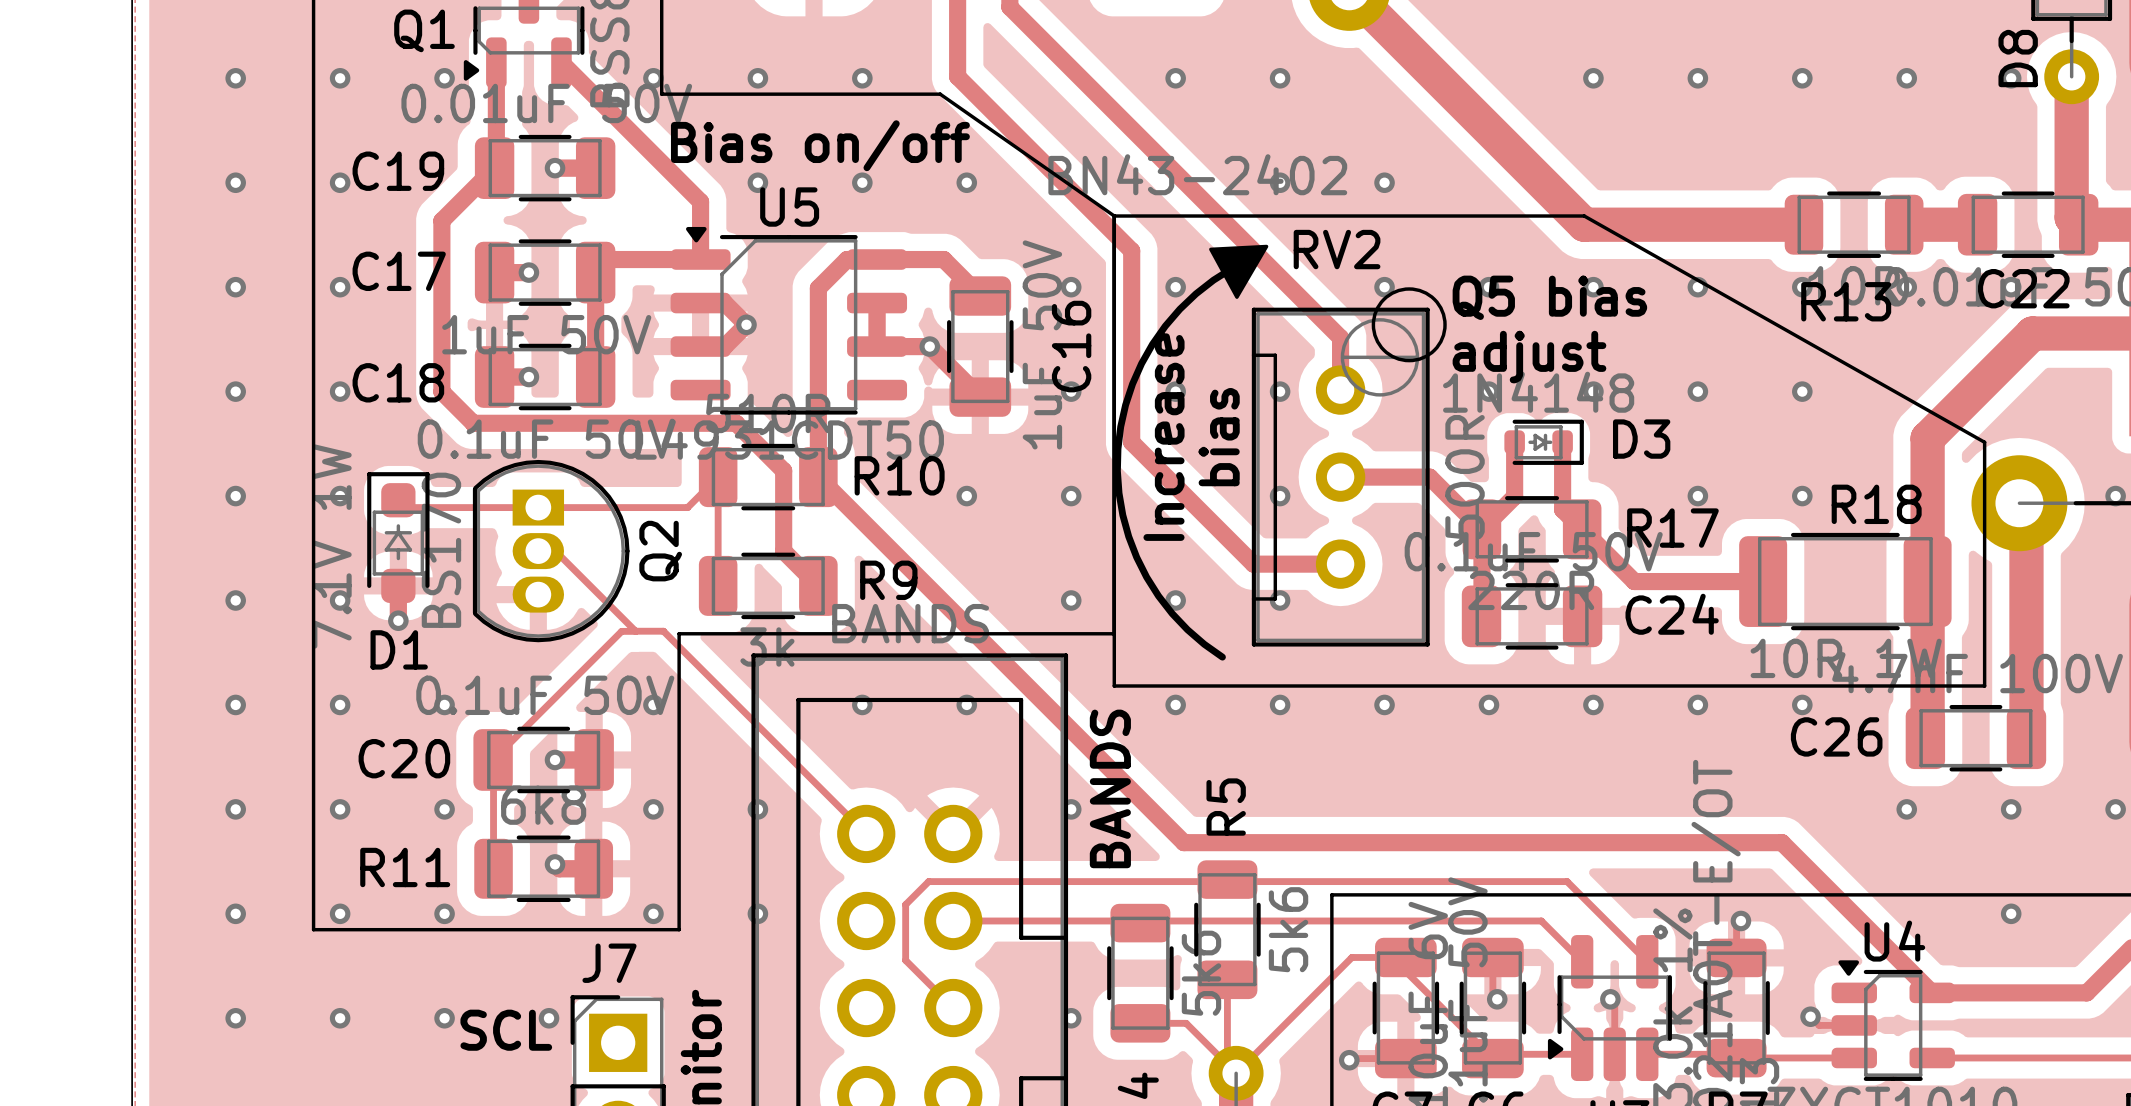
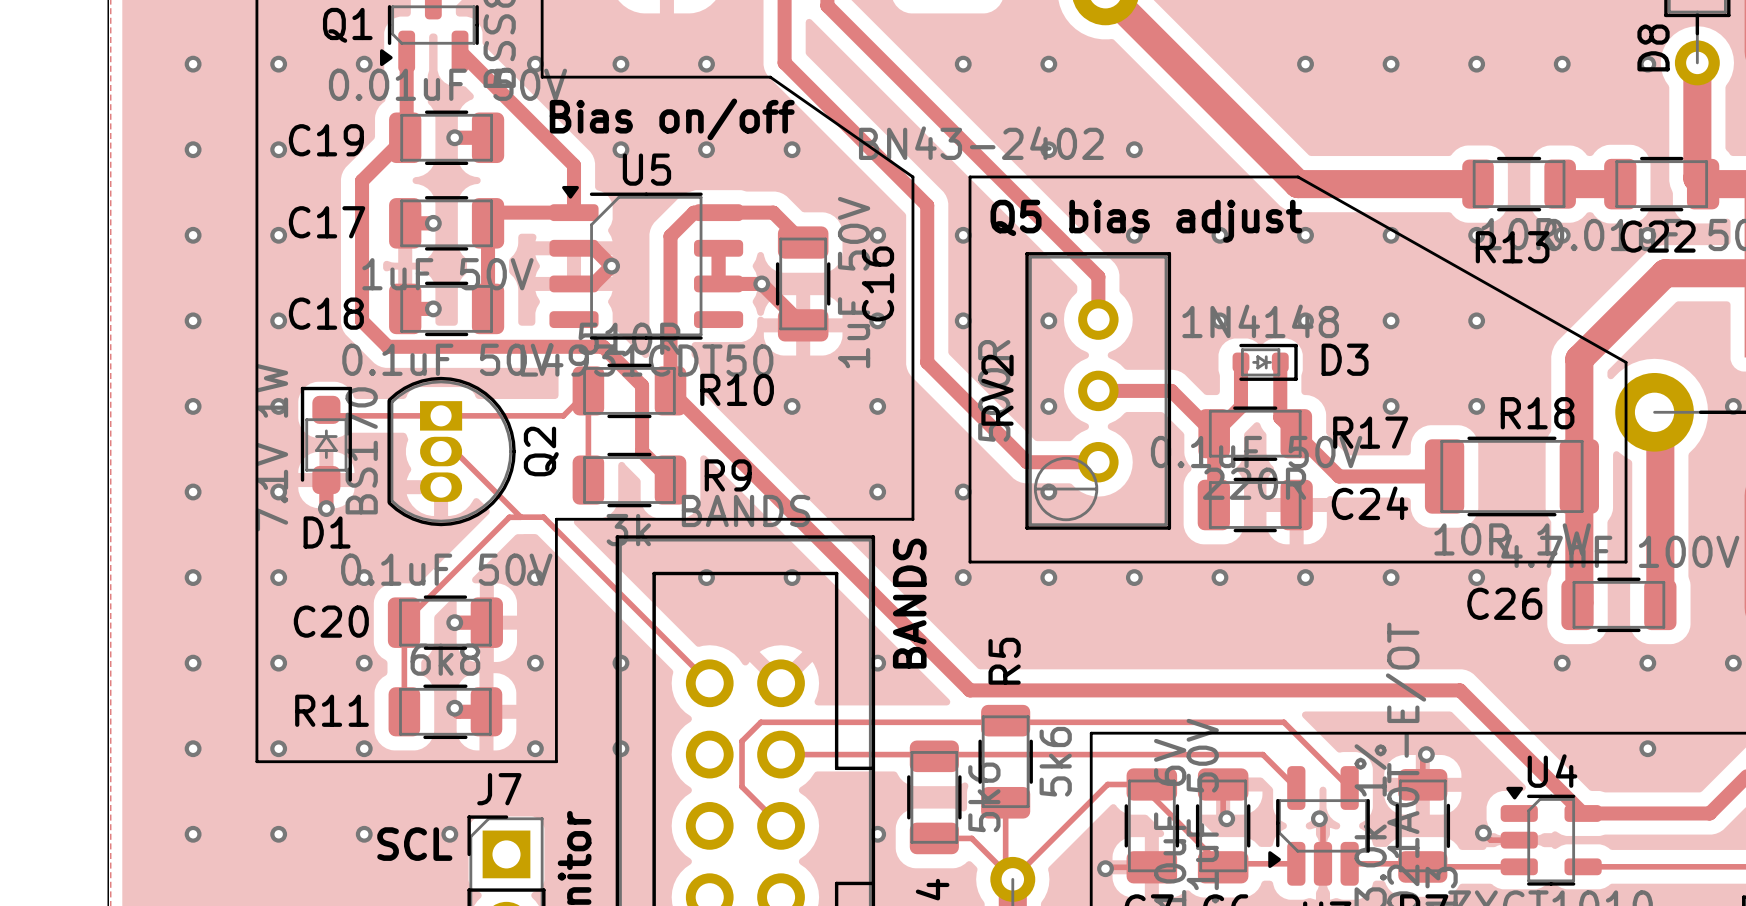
line: (1114, 216) (1183, 216) -> none
drawing: [1209, 244, 1269, 299] -> none
RV2 name position: RV2 (1337, 249) -> RV2 (997, 390)
line: (1252, 258) (1213, 280) (1195, 293) (1179, 309) (1152, 344) (1132, 383) (1125, 405) (1117, 448) (1119, 493) (1122, 515) (1128, 536) (1146, 577) (1172, 613) (1204, 644) (1222, 657) -> none
drawing: [1371, 287, 1447, 363] -> none
text: Q5 bias (1549, 297) -> Q5 bias adjust (1146, 221)
line: (1253, 355) (1275, 355) (1275, 598) (1253, 598) -> none
text: adjust (1529, 357) -> none
text: Increase (1163, 437) -> none
text: bias (1219, 437) -> none
RV2 rotation: 0° (1340, 477) -> 180° (1098, 390)
line: (1114, 633) (1114, 685) (1183, 685) -> (970, 176) (970, 562)
text position: BANDS (1110, 788) -> BANDS (909, 603)

